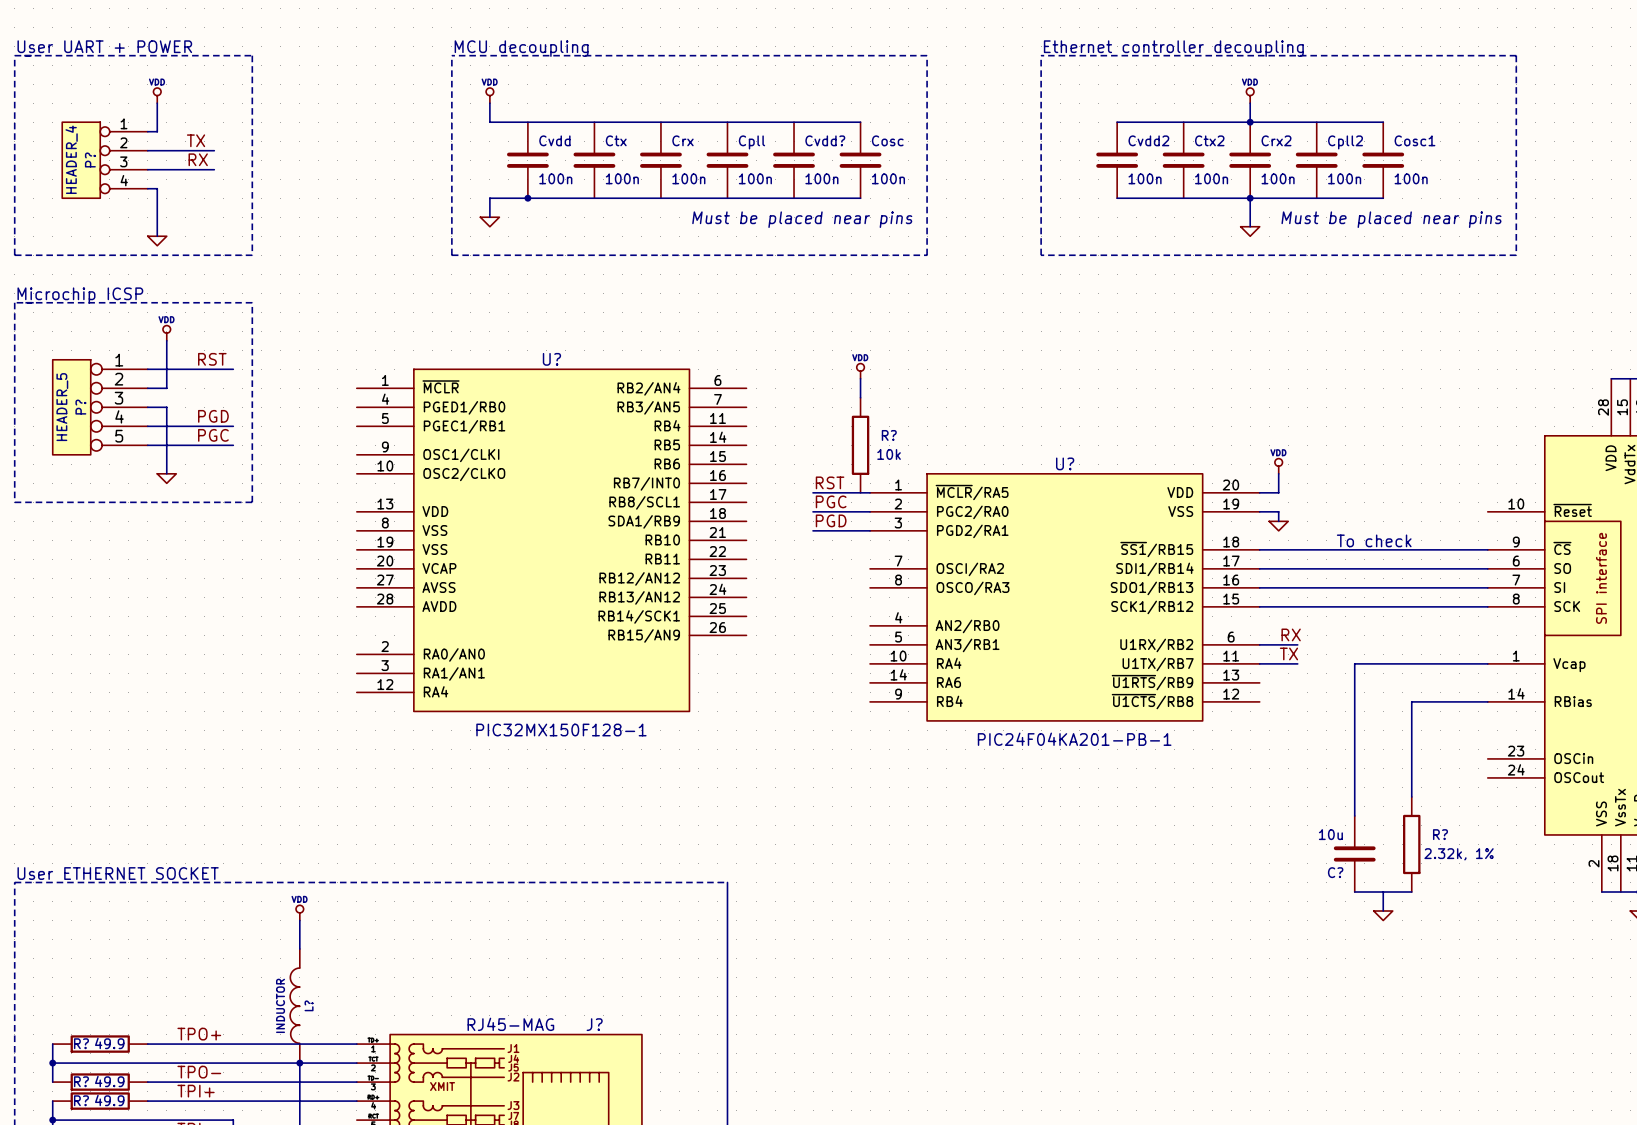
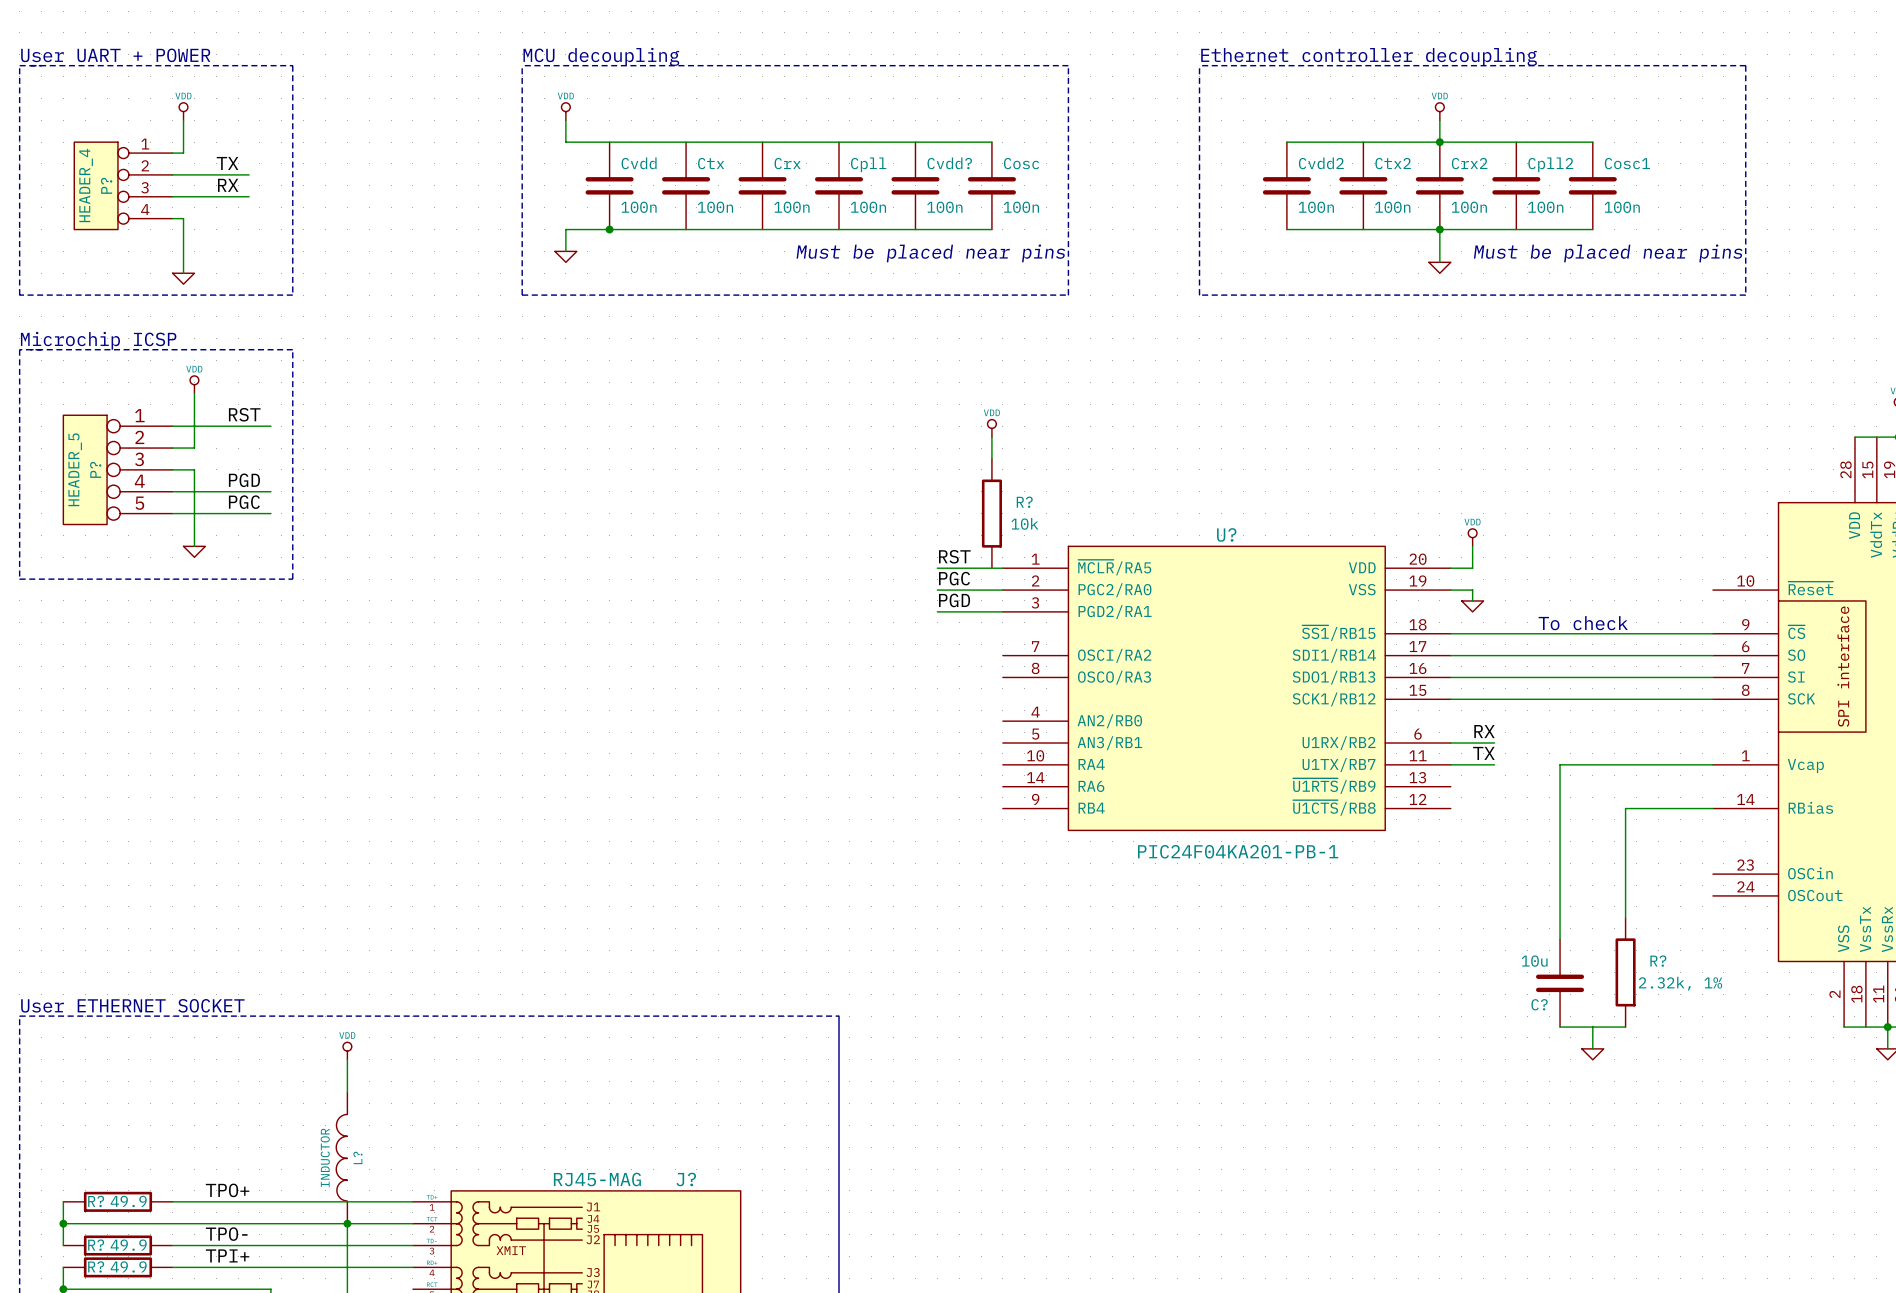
U?: PIC32MX150F128-1 (551, 540) -> none

